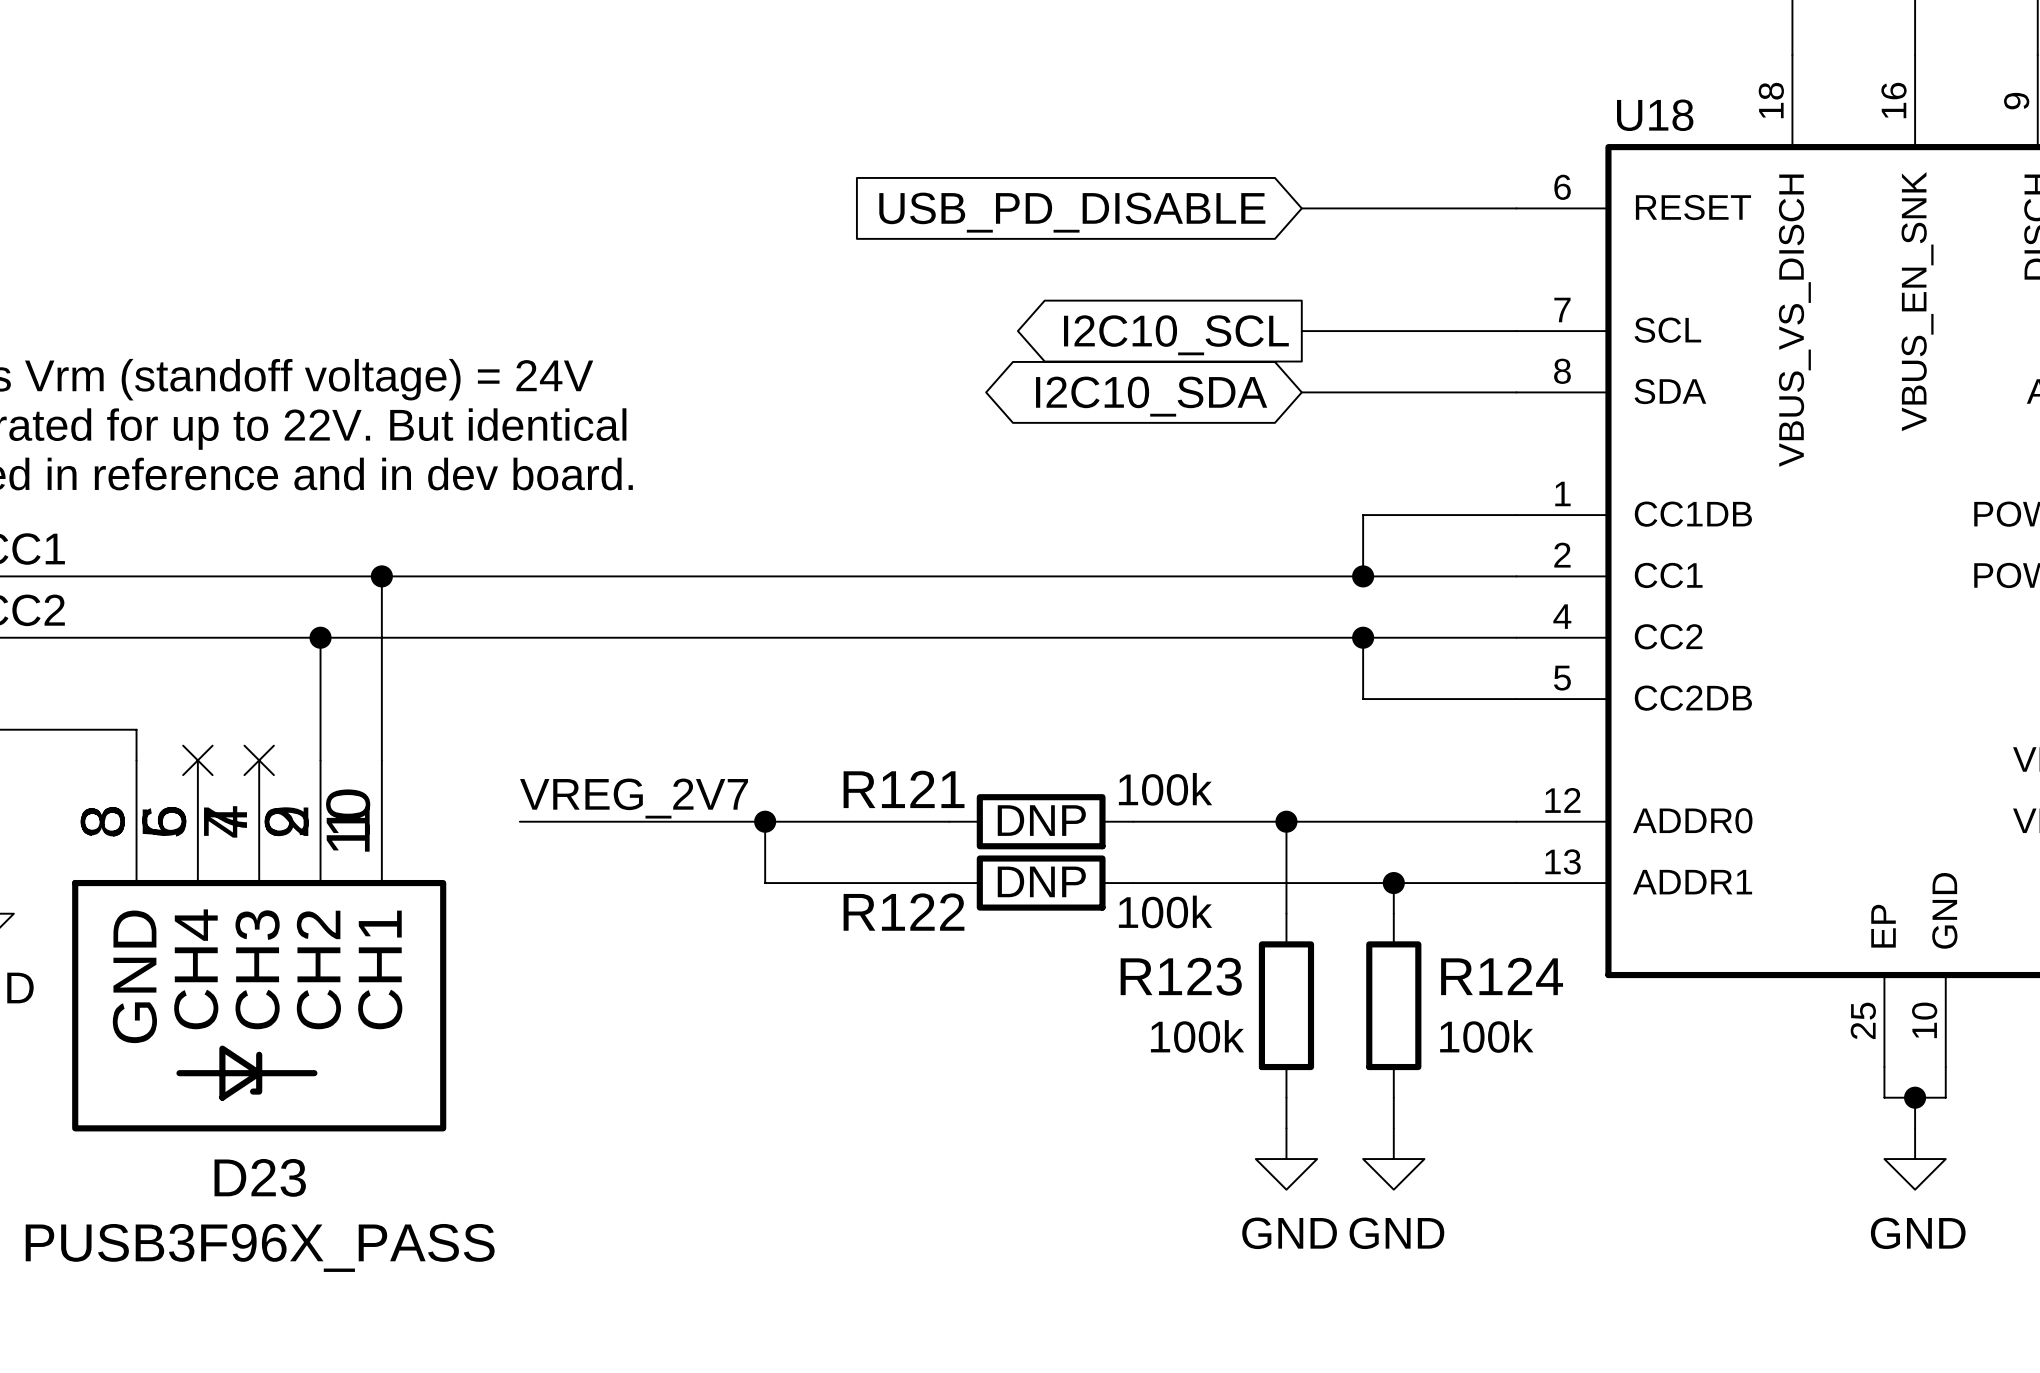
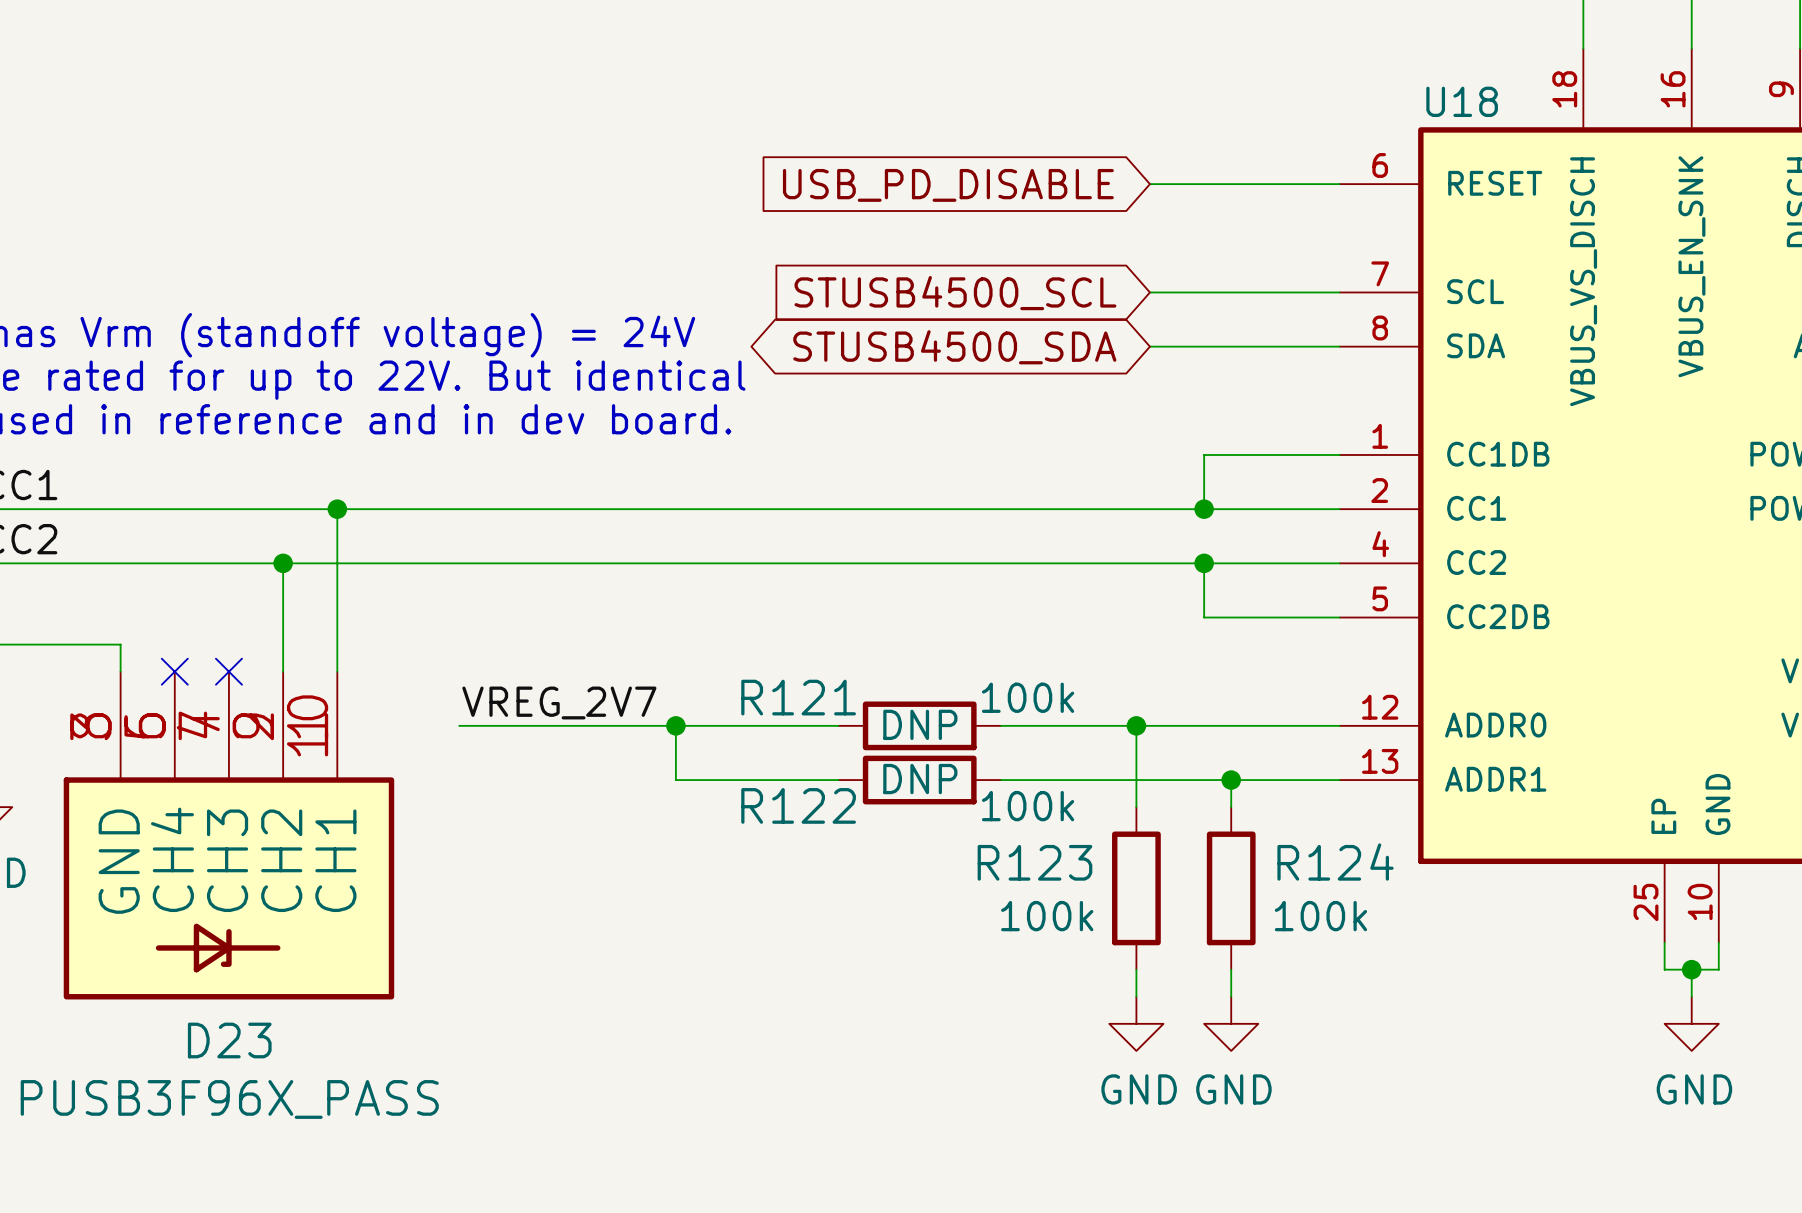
global label shape: output (1176, 335) -> input (955, 293)
global label: I2C10_SCL (1176, 335) -> STUSB4500_SCL (955, 293)
global label: I2C10_SDA (1151, 396) -> STUSB4500_SDA (954, 347)

